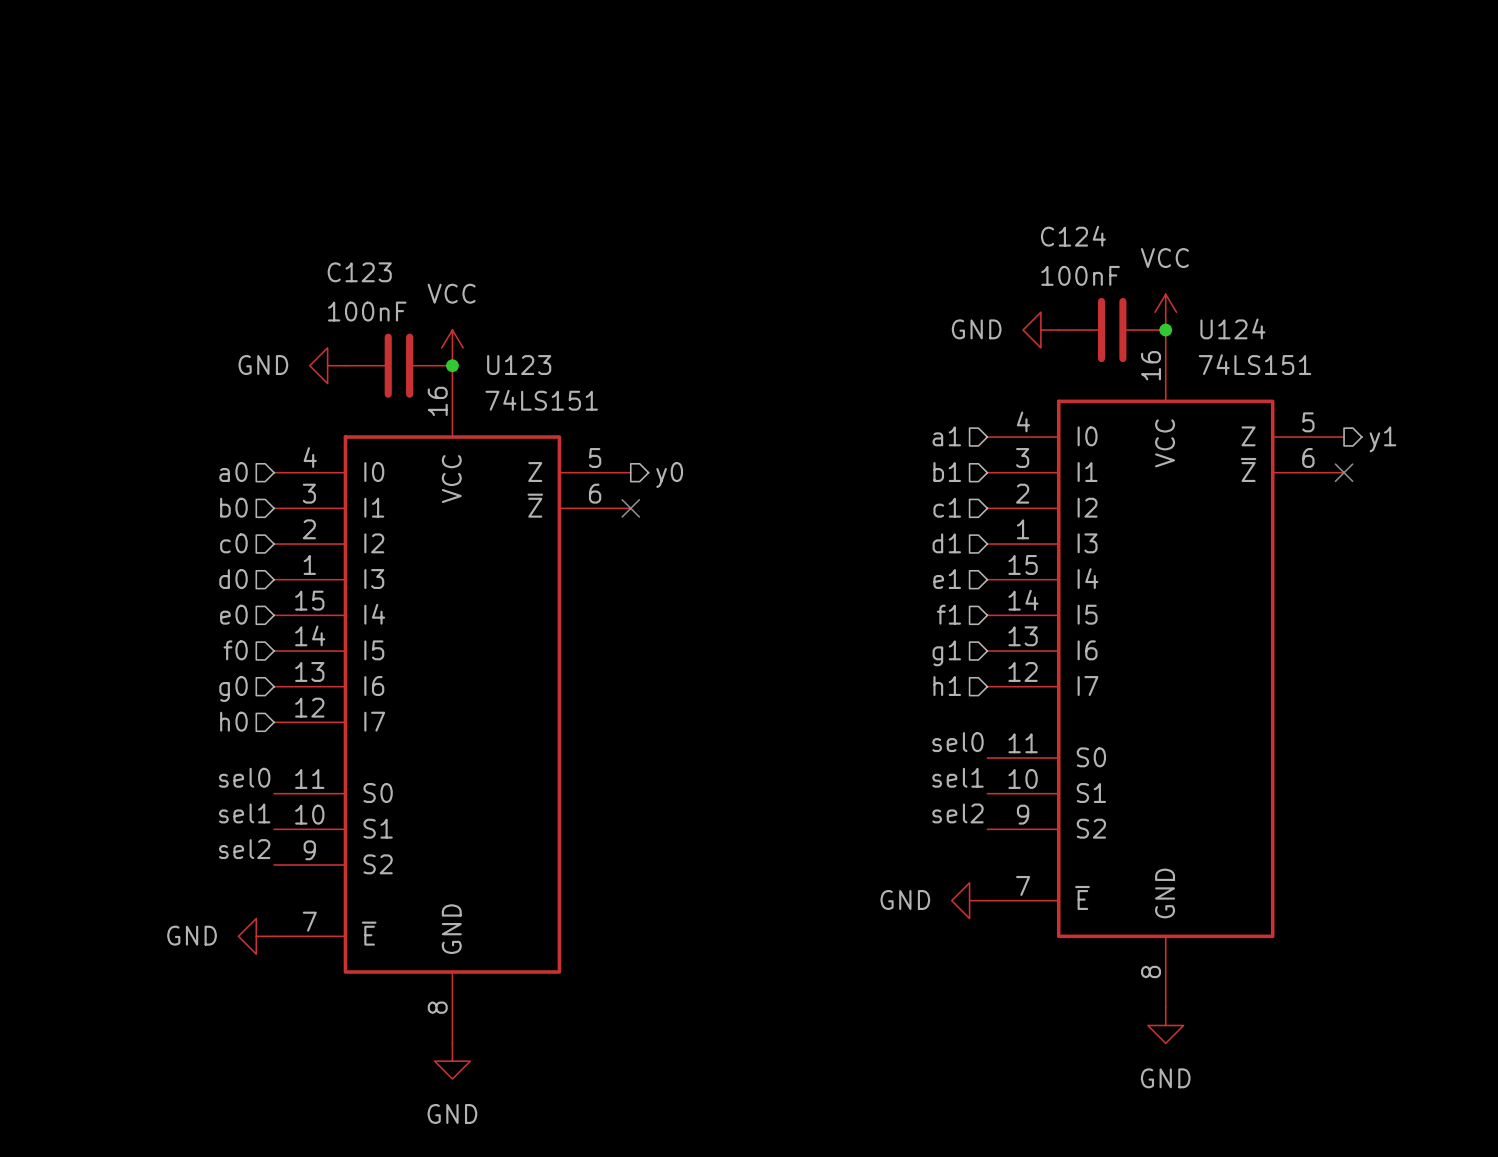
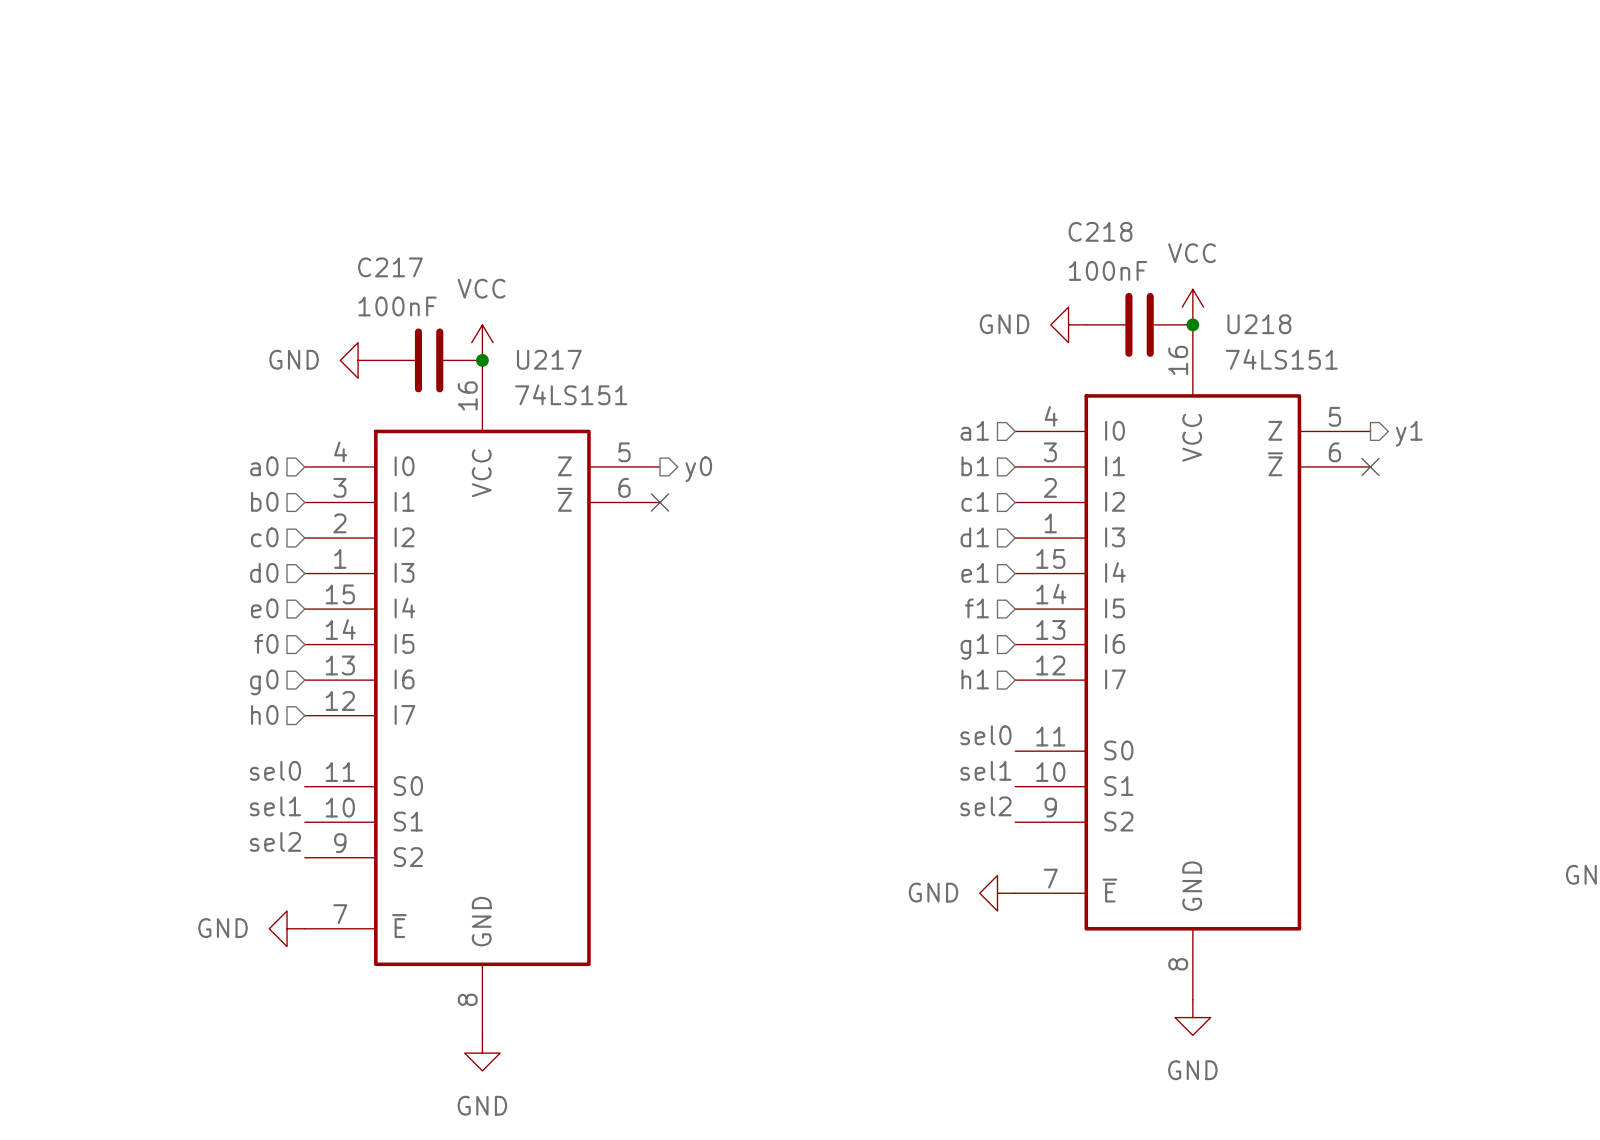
C124 name: C124 (1073, 236) -> C218 (1100, 231)
C123 name: C123 (359, 272) -> C217 (390, 267)
U124 name: U124 (1232, 328) -> U218 (1259, 324)
U123 name: U123 (519, 365) -> U217 (549, 359)

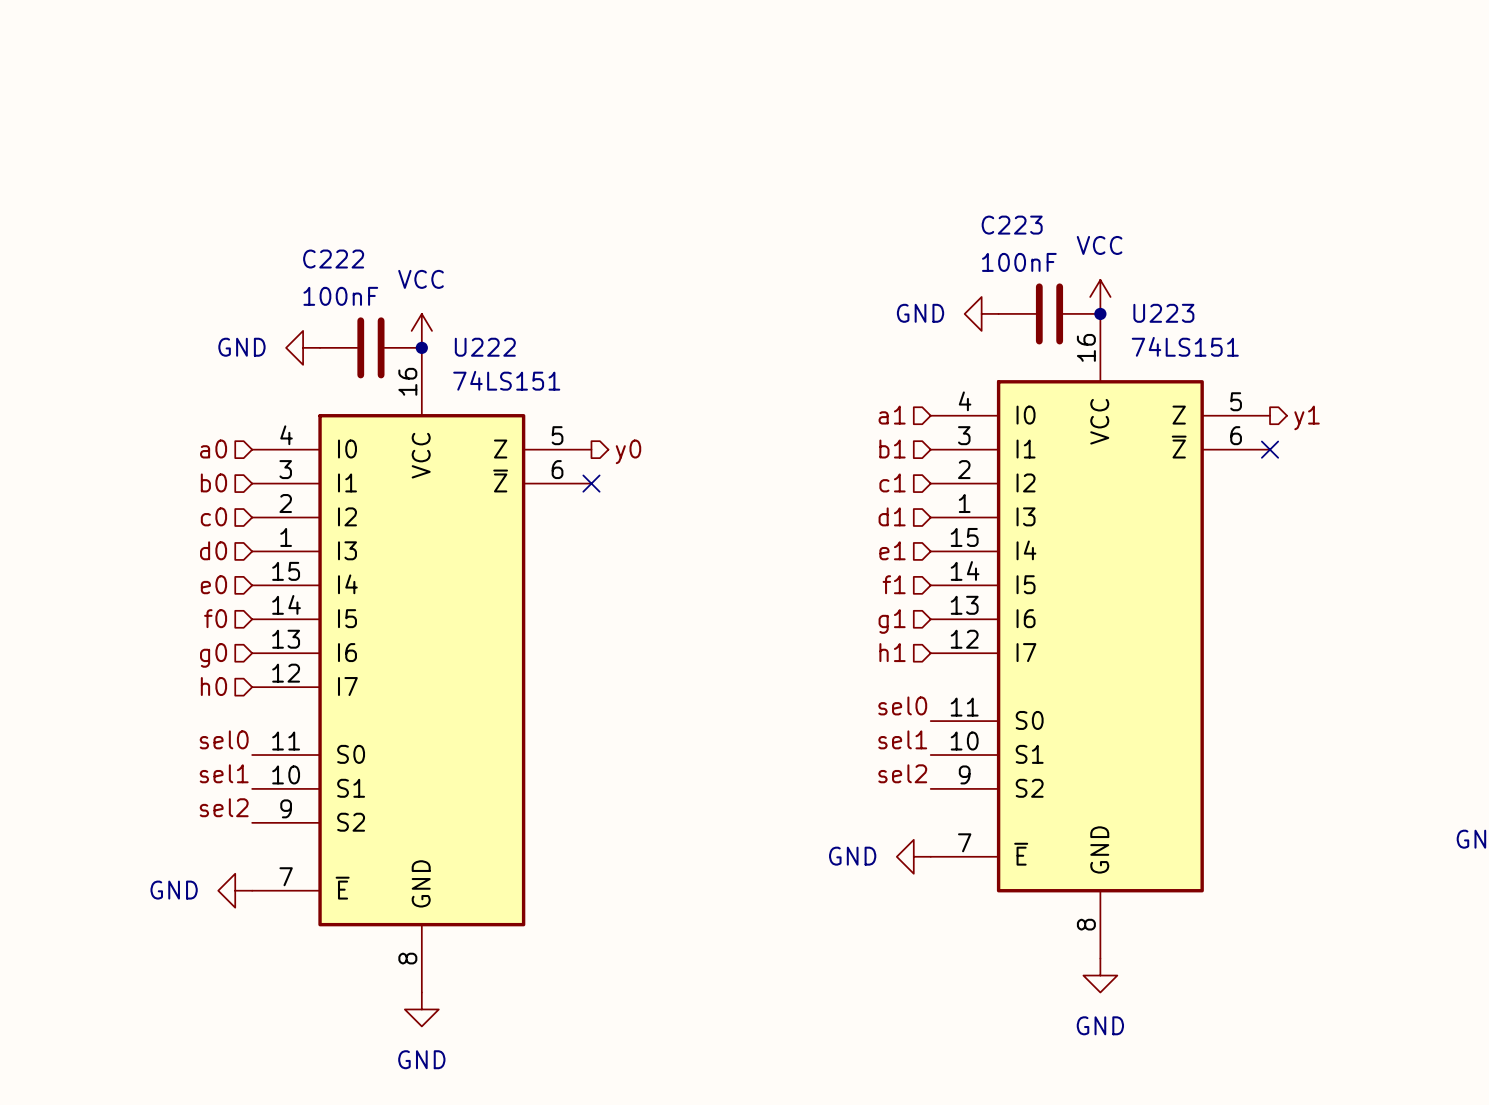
C218 name: C218 (1100, 231) -> C223 (1012, 225)
C217 name: C217 (390, 267) -> C222 (333, 259)
U218 name: U218 (1259, 324) -> U223 (1163, 313)
U217 name: U217 (549, 359) -> U222 (485, 347)

